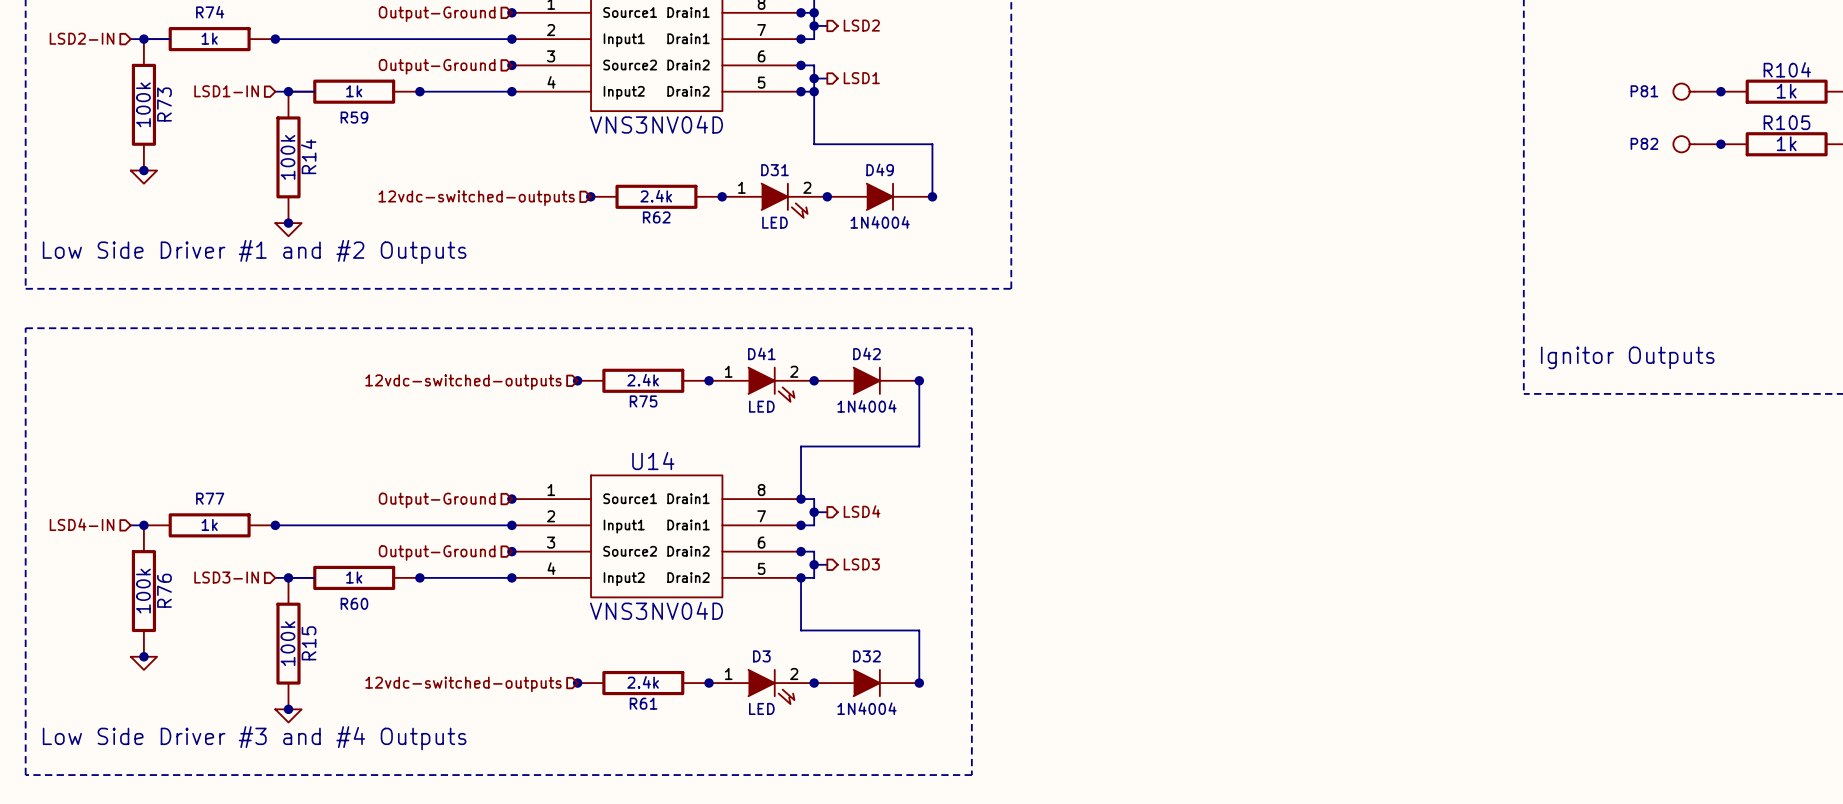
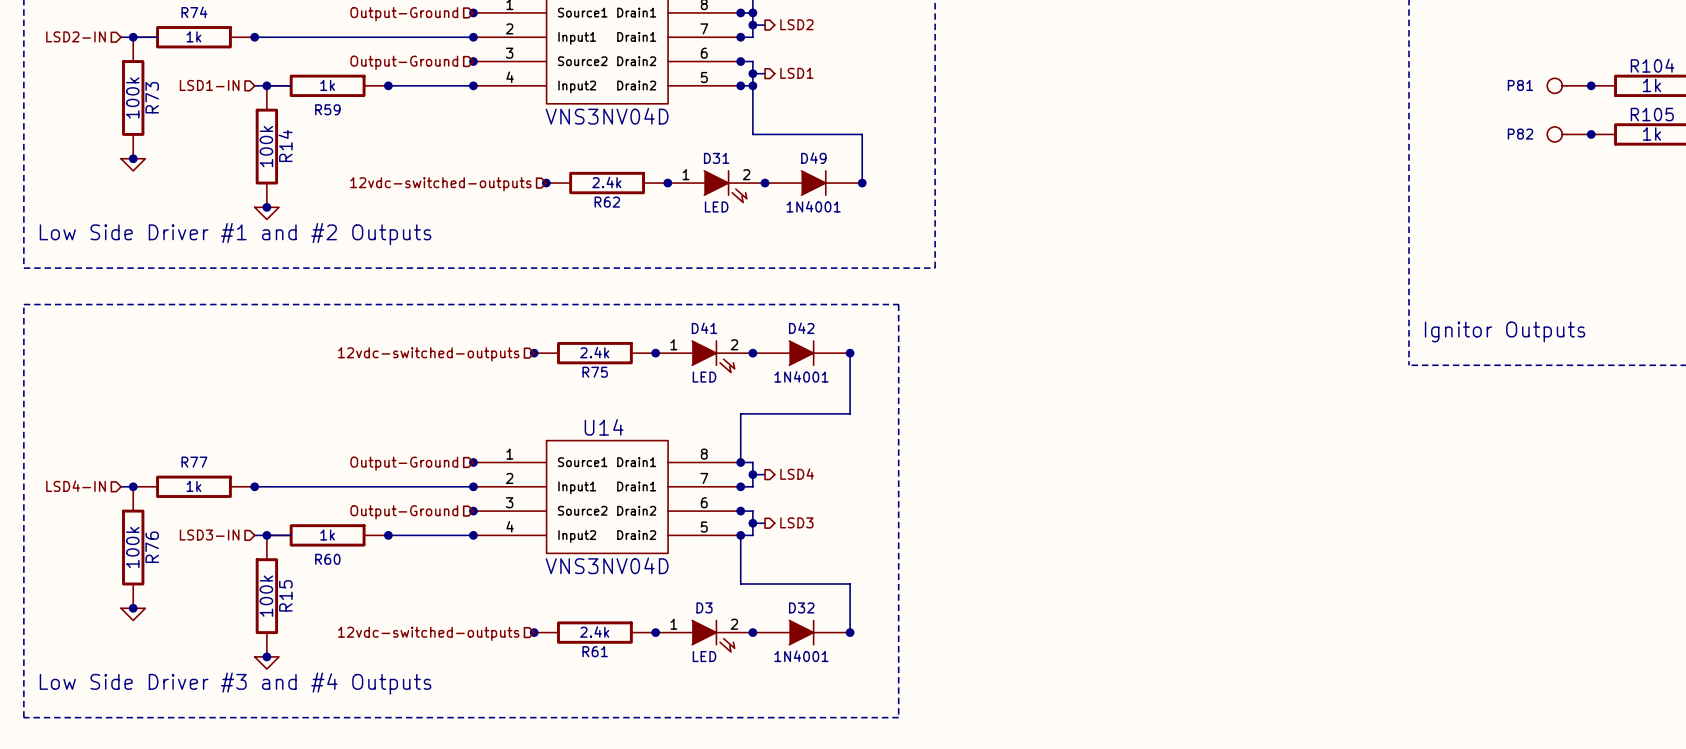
D49 value: 1N4004 (880, 222) -> 1N4001 (813, 206)
D42 value: 1N4004 (866, 406) -> 1N4001 (801, 376)
D32 value: 1N4004 (866, 708) -> 1N4001 (801, 656)

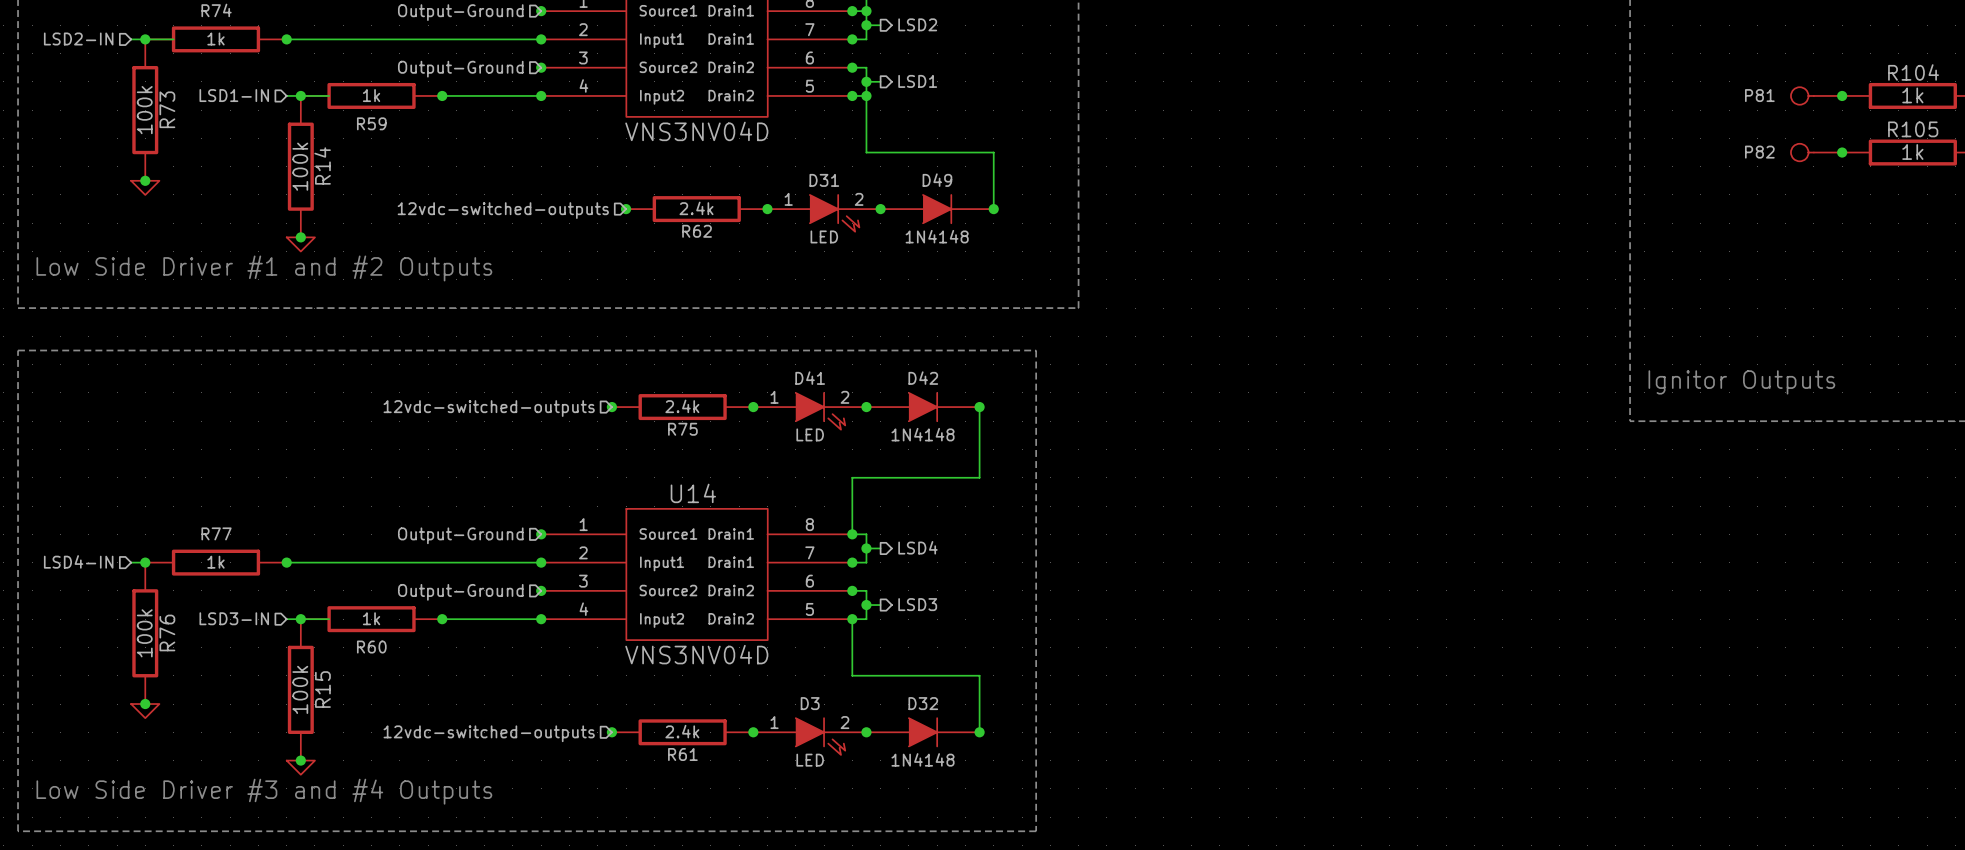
D49 value: 1N4001 (813, 206) -> 1N4148 (937, 236)
D42 value: 1N4001 (801, 376) -> 1N4148 (923, 434)
D32 value: 1N4001 (801, 656) -> 1N4148 (923, 759)

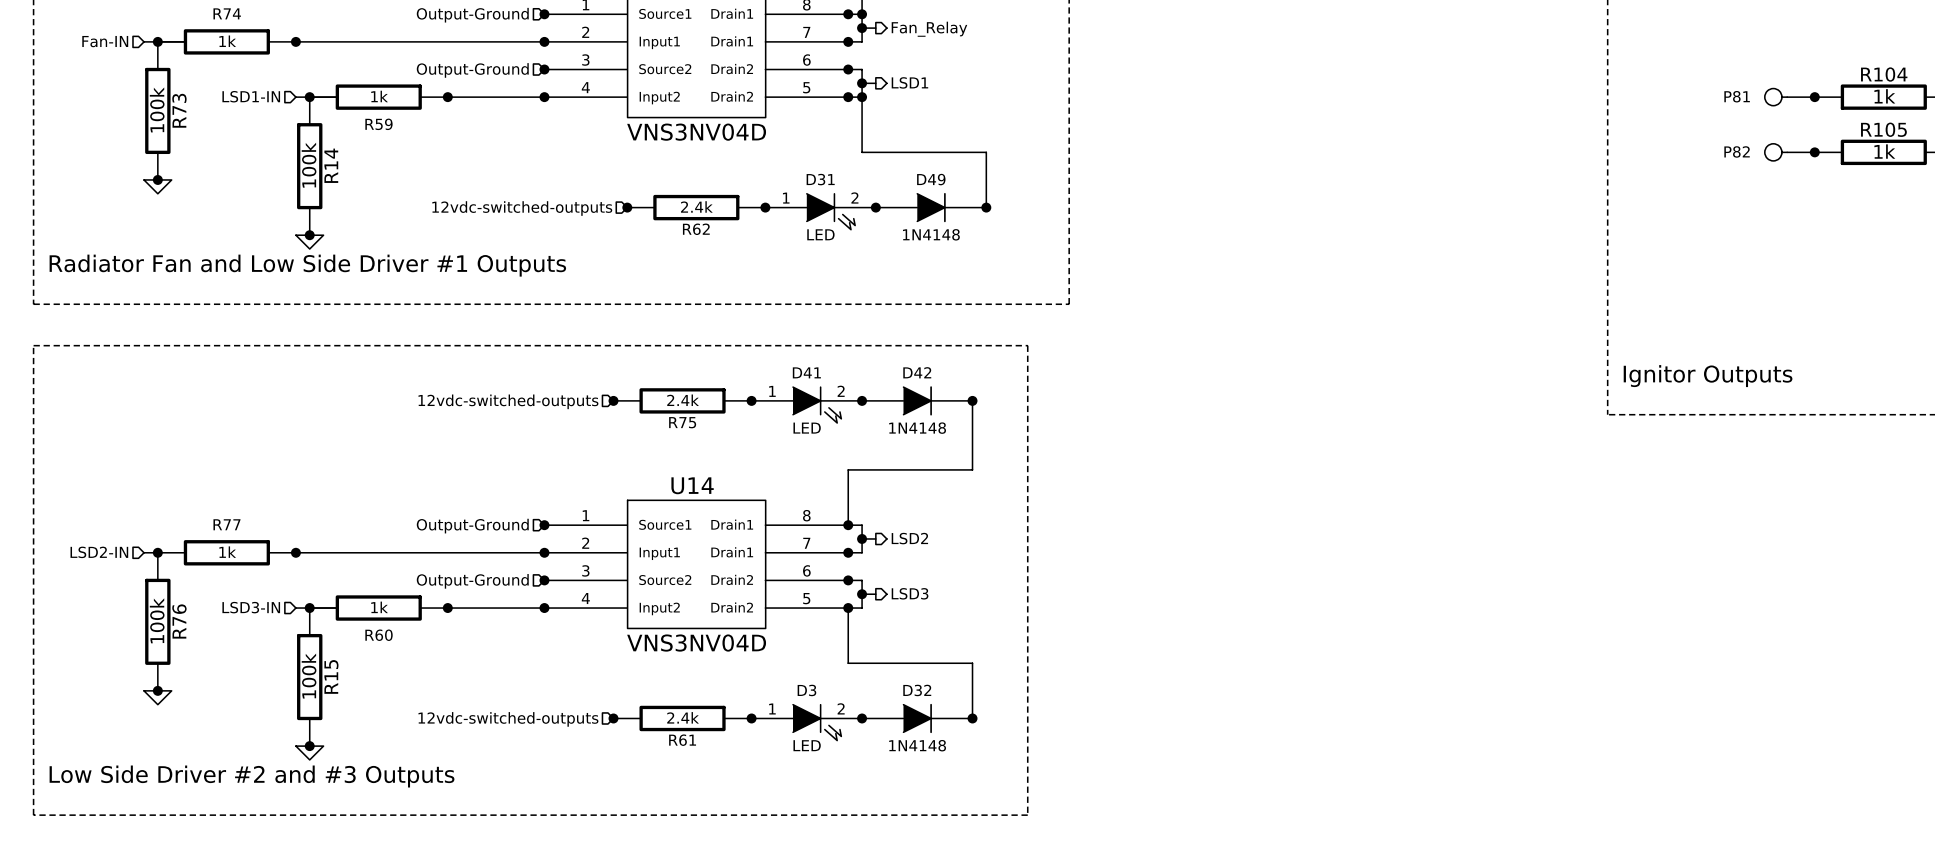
hierarchical label: LSD2 (917, 24) -> Fan_Relay (929, 29)
hierarchical label: LSD2-IN (78, 38) -> Fan-IN (105, 41)
text: Low Side Driver #1 and #2 Outputs (264, 268) -> Radiator Fan and Low Side Driver #1 Outputs (307, 265)
hierarchical label: LSD4 (917, 547) -> LSD2 (909, 538)
hierarchical label: LSD4-IN (78, 561) -> LSD2-IN (99, 552)
text: Low Side Driver #3 and #4 Outputs (264, 791) -> Low Side Driver #2 and #3 Outputs (252, 776)

